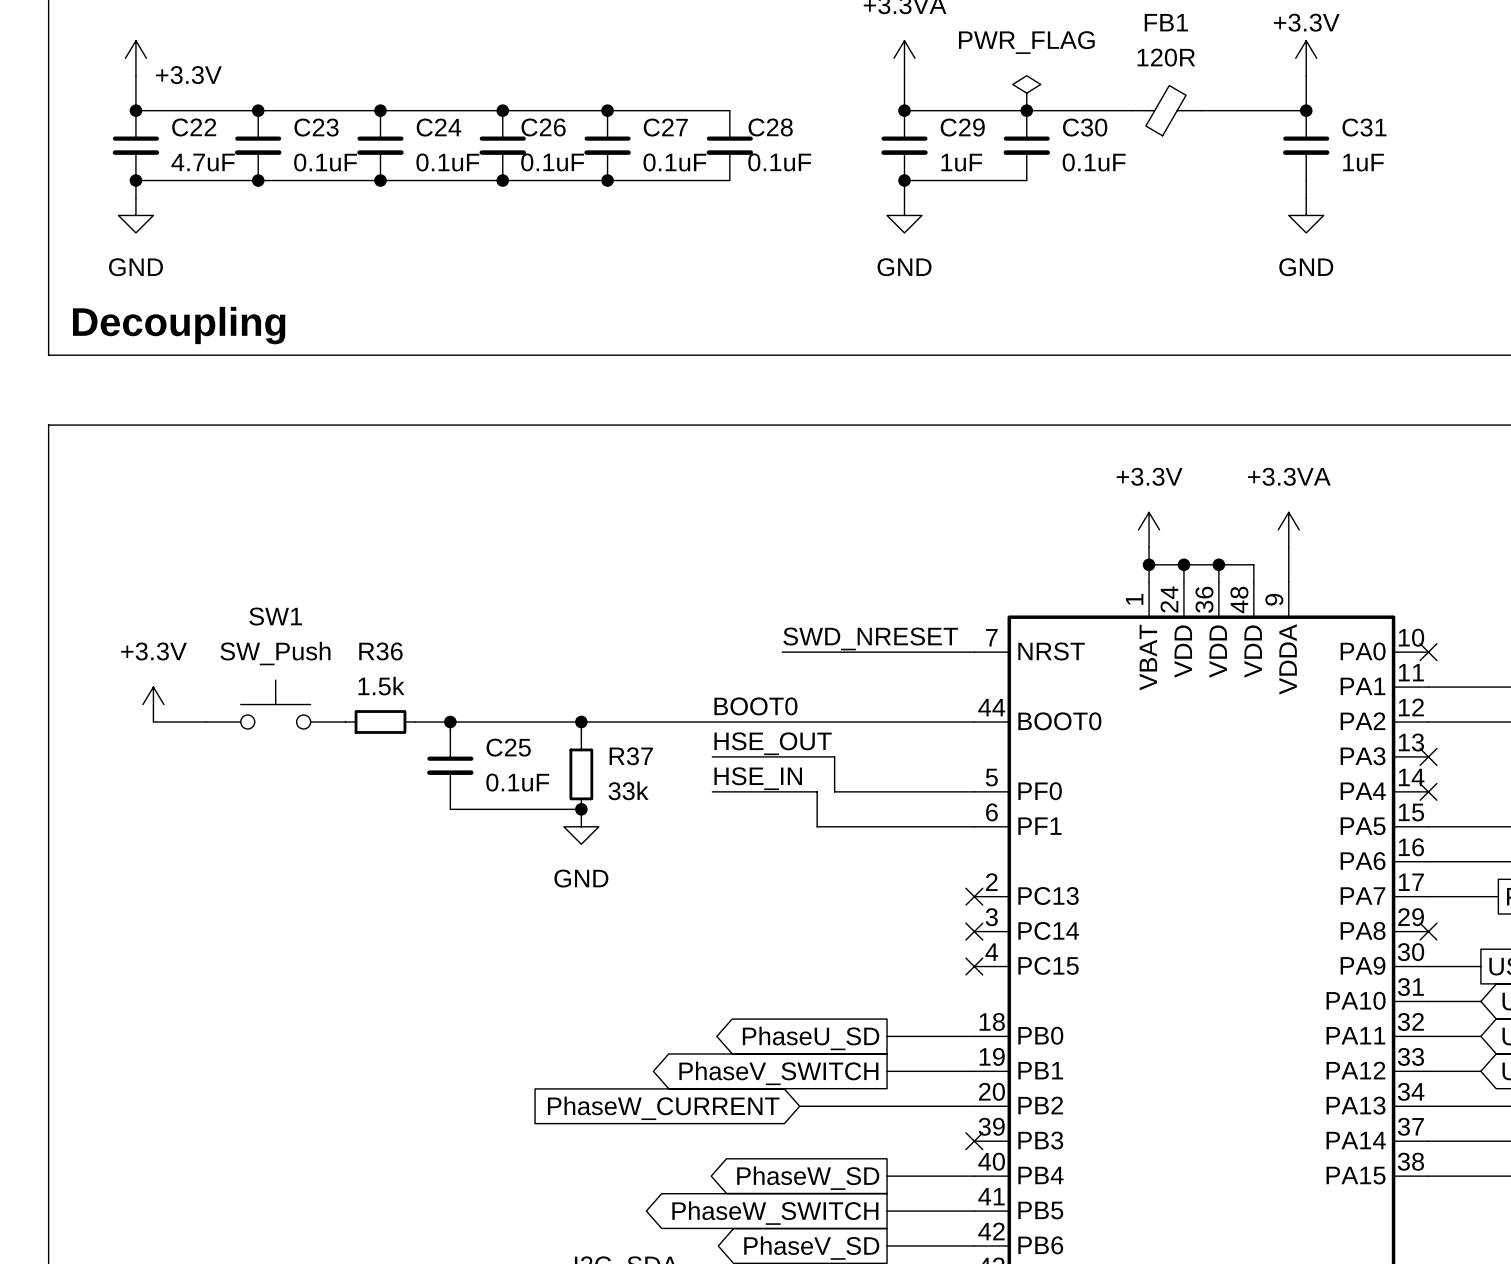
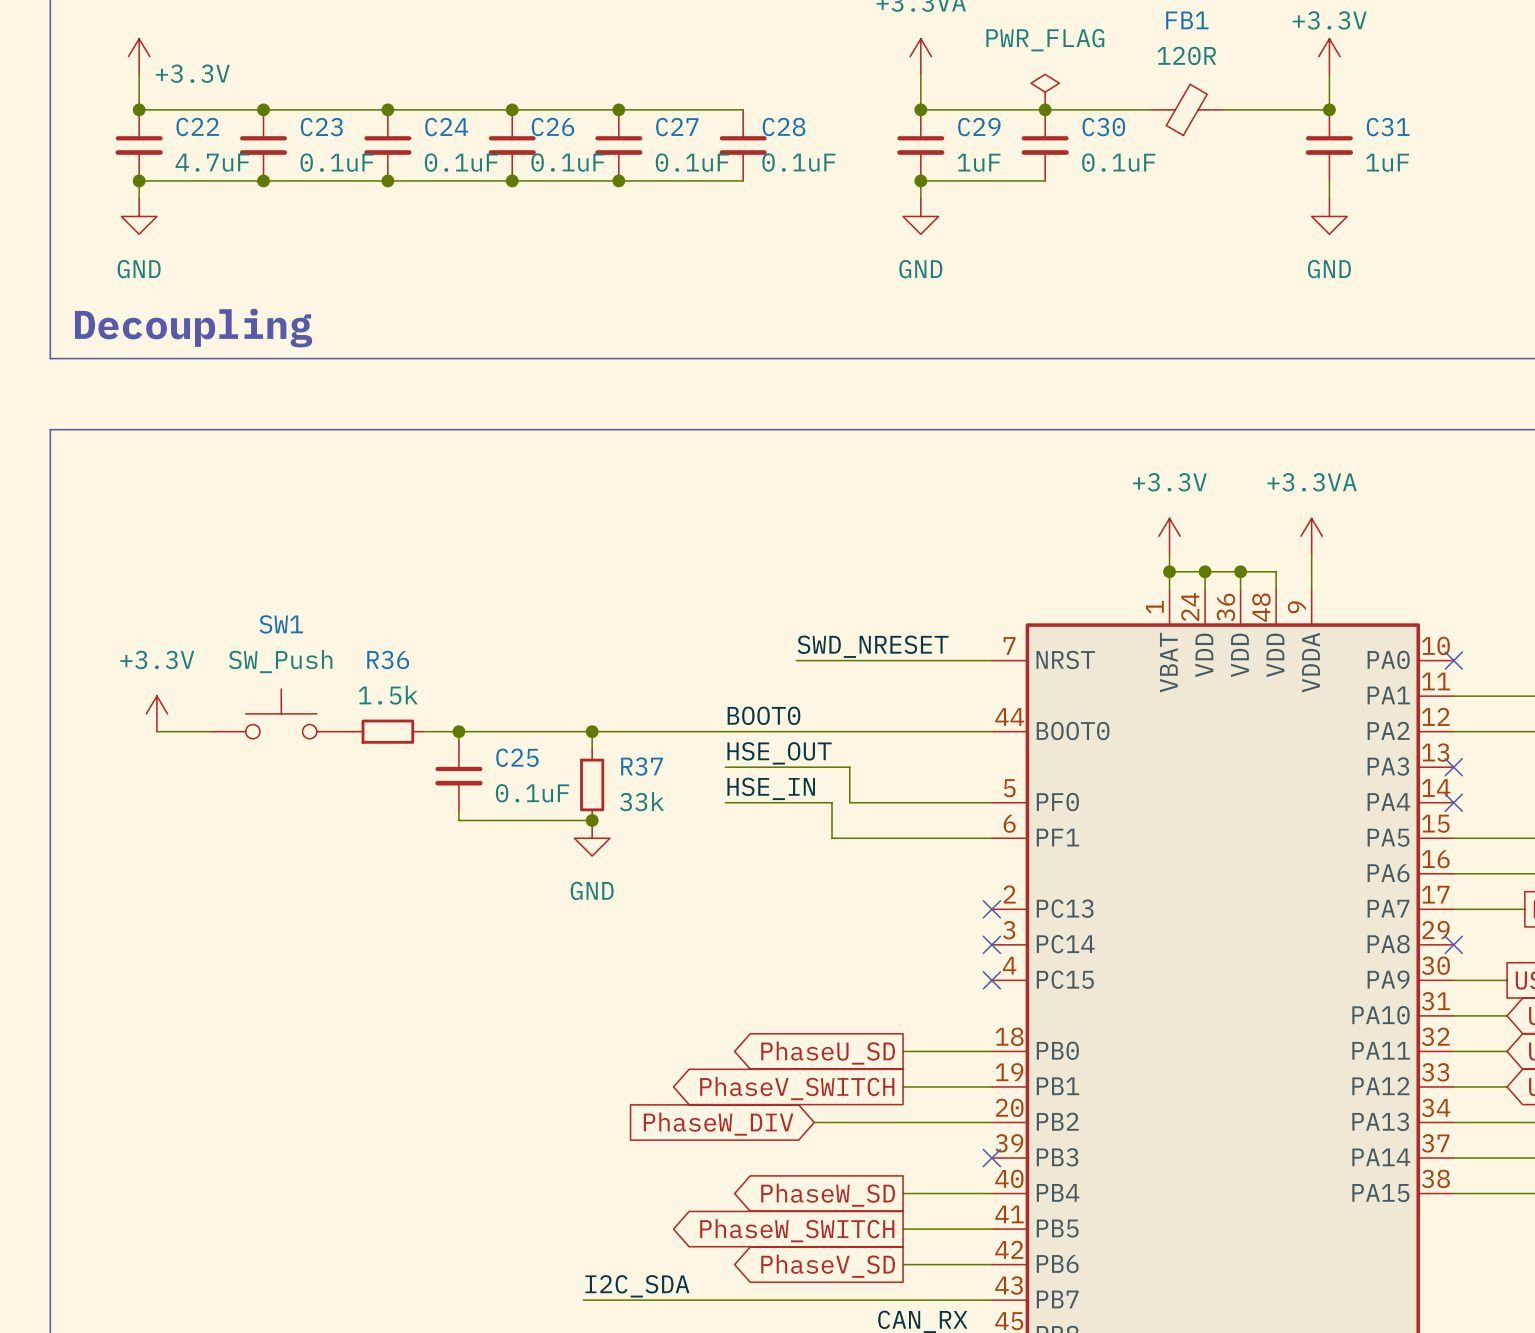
global label: PhaseW_CURRENT (663, 1108) -> PhaseW_DIV (718, 1124)

